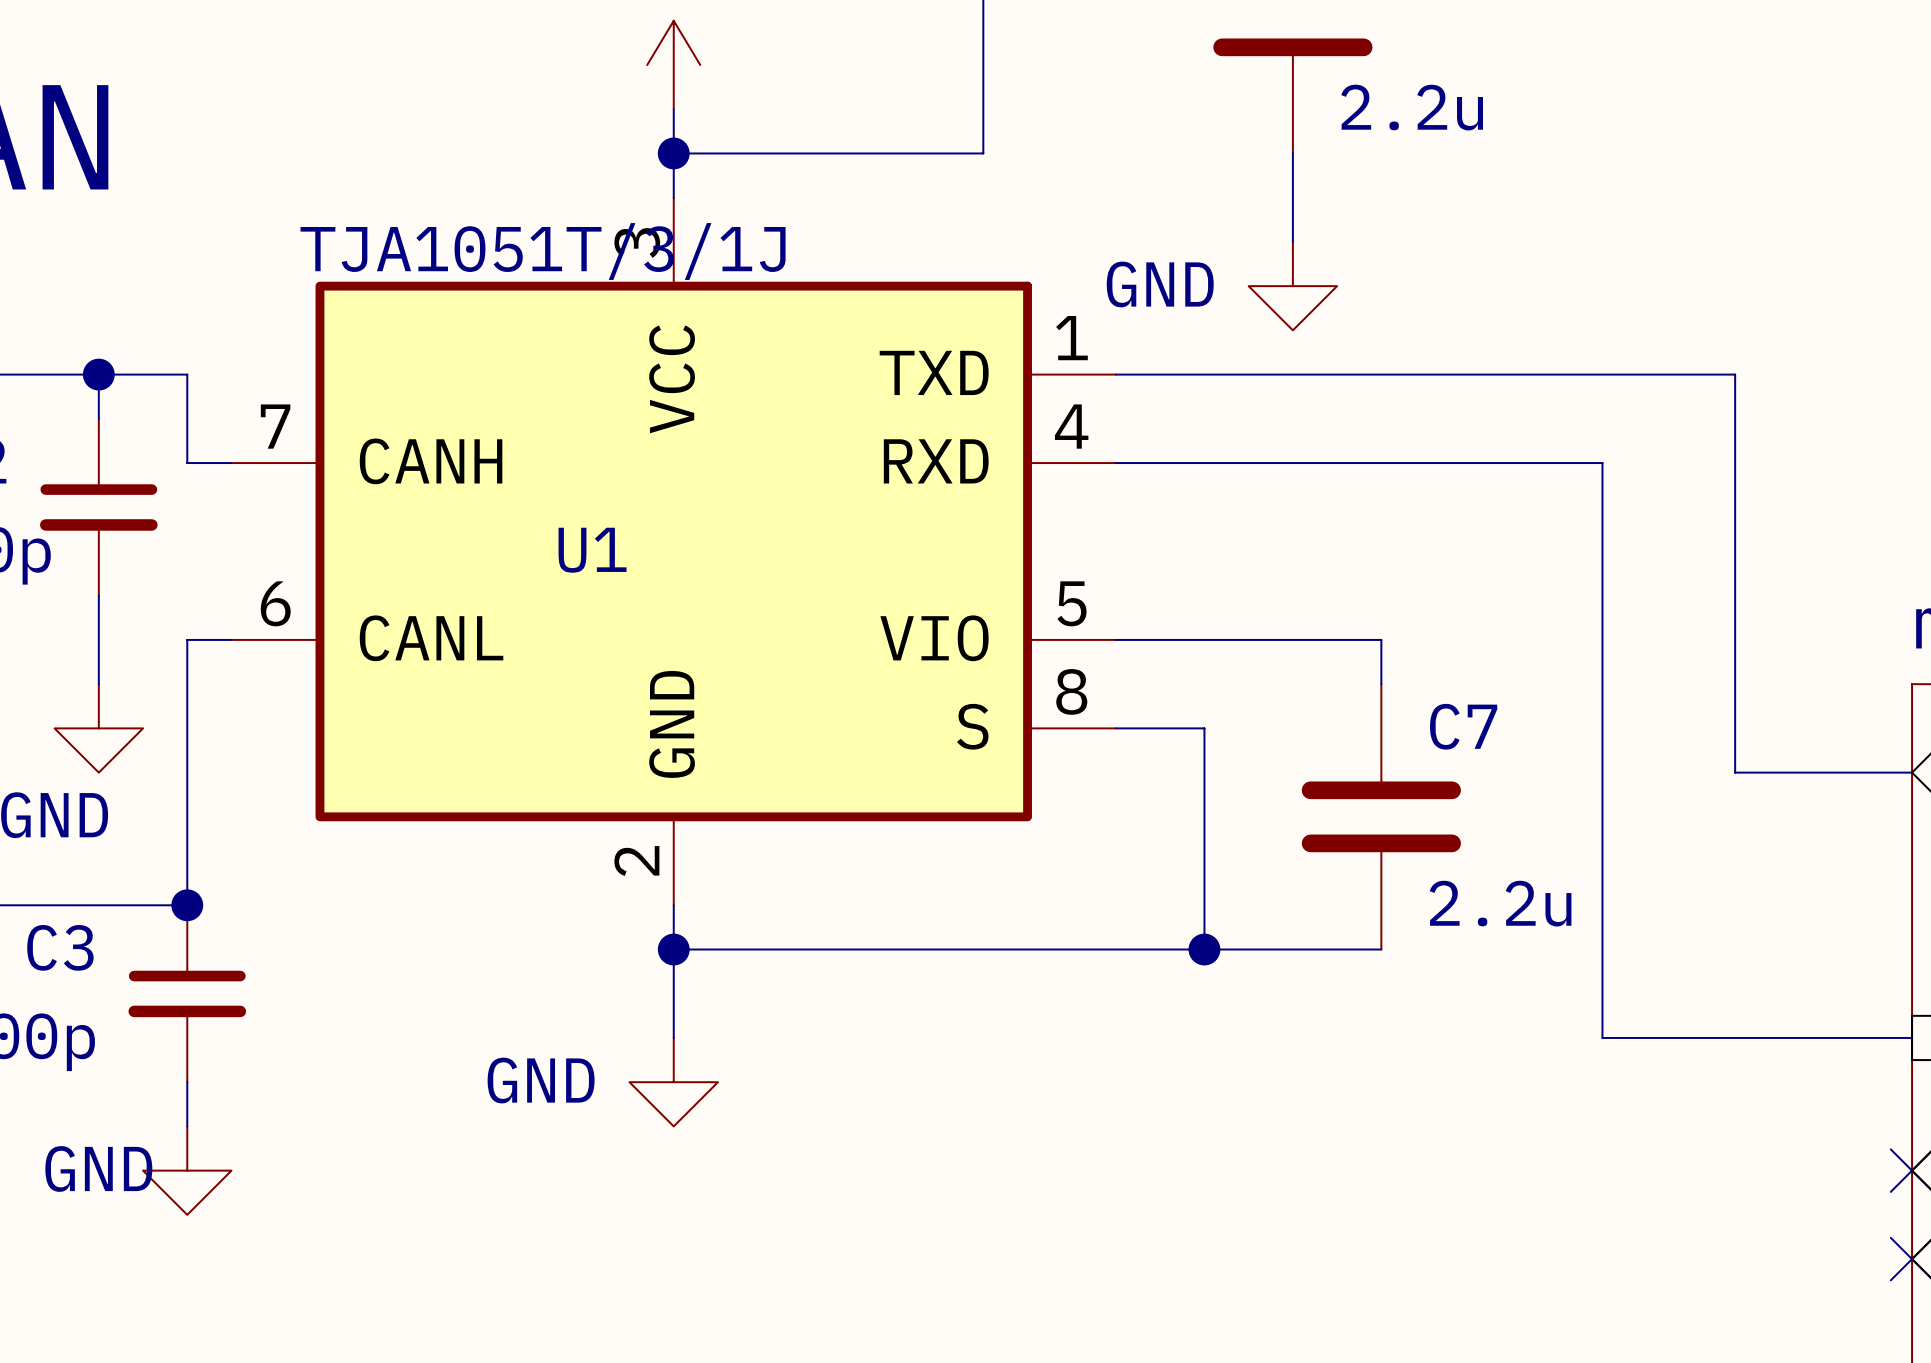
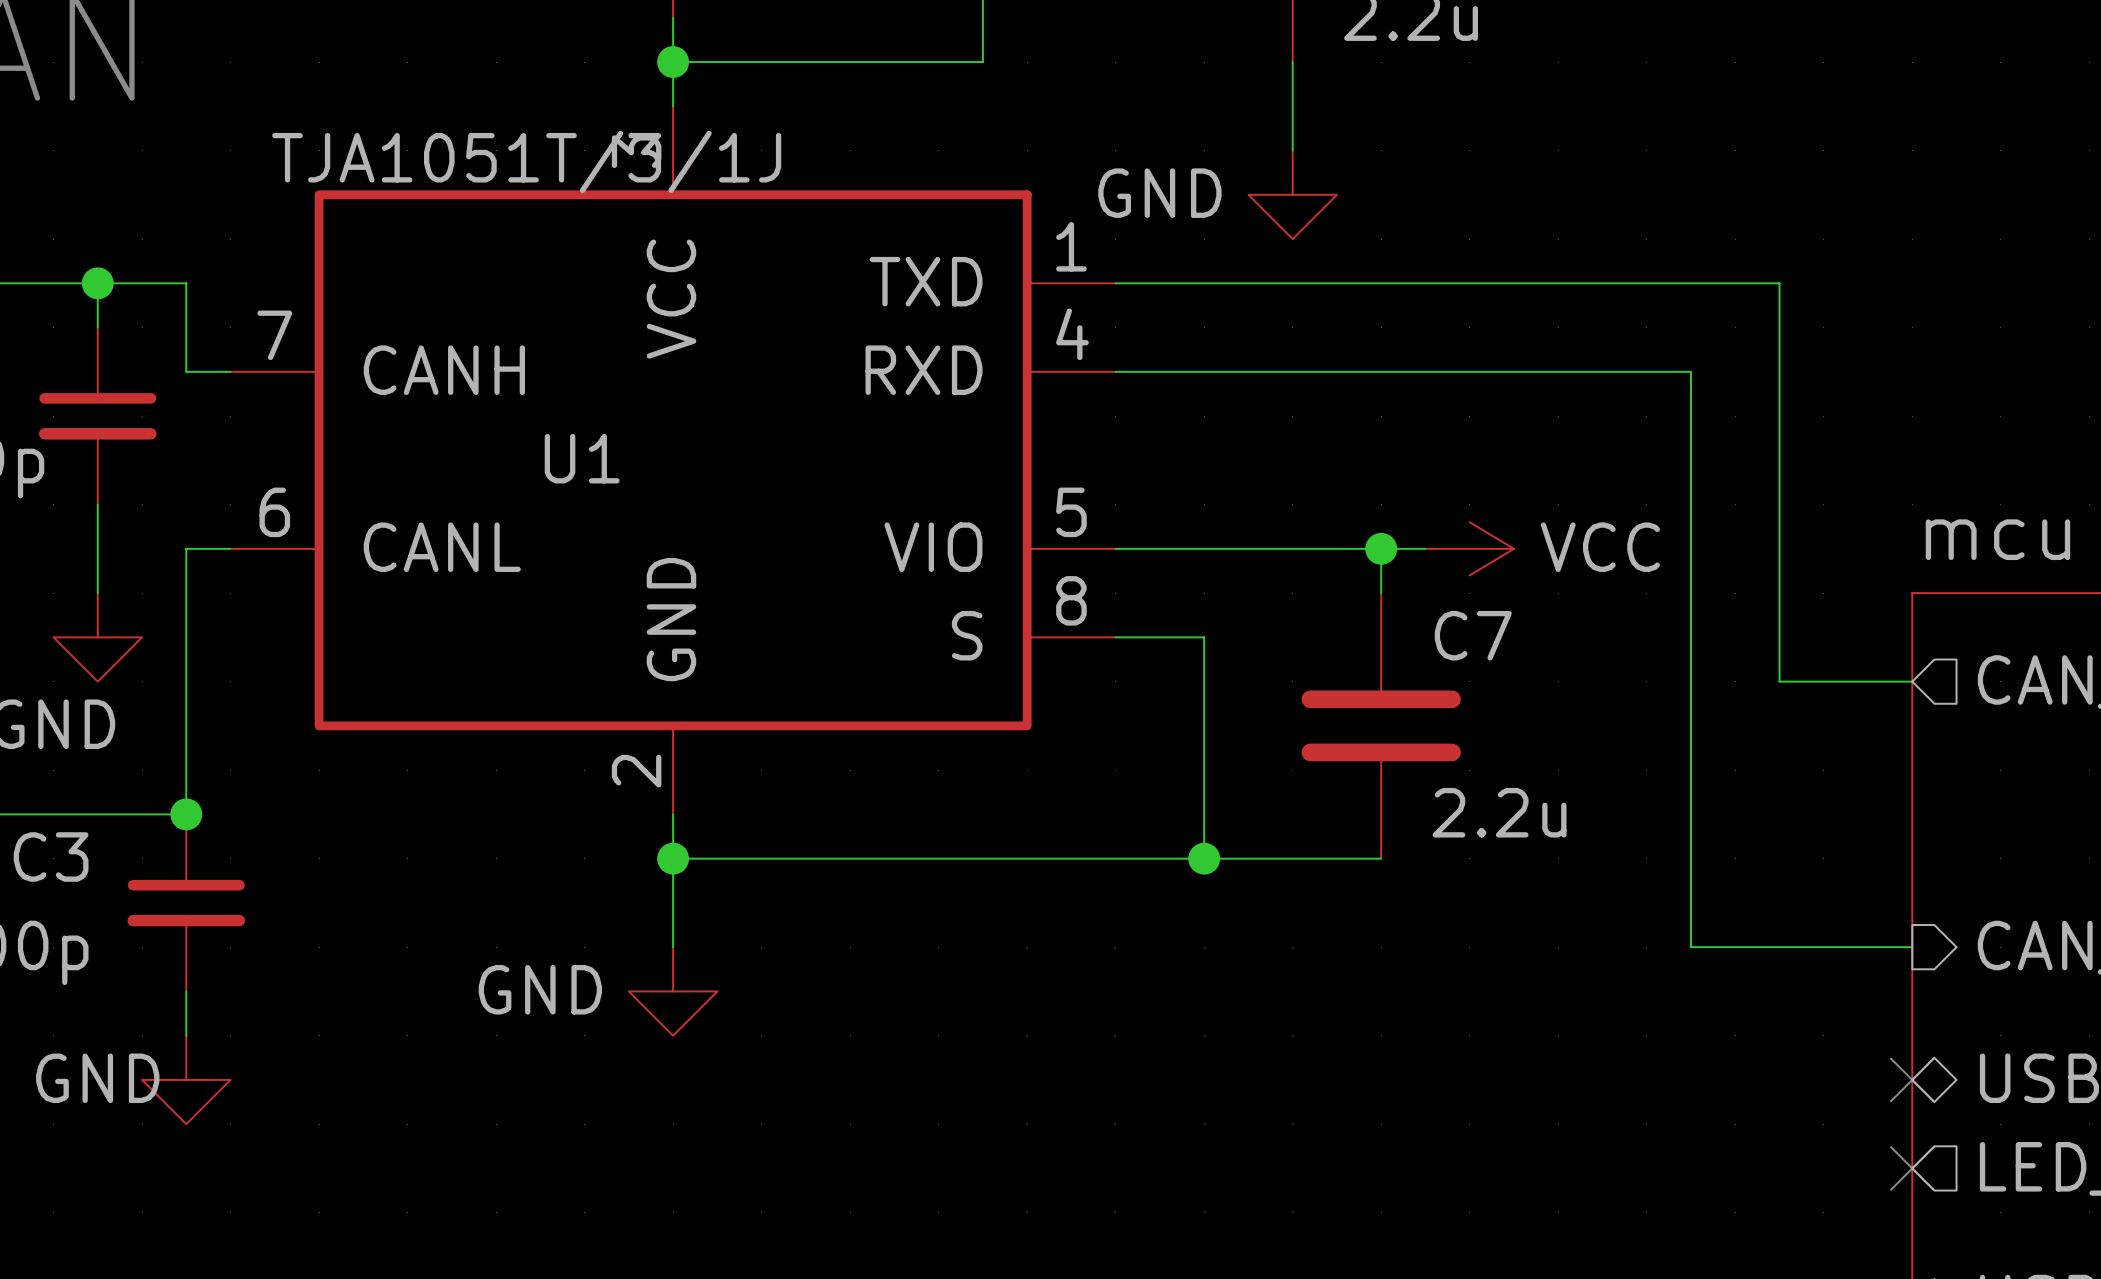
wire: (1735, 374) (1735, 772) (1779, 772) -> (1735, 283) (1779, 283) (1779, 681)
wire: (1602, 463) (1602, 1037) (1690, 1037) -> (1602, 371) (1691, 371) (1691, 947)
wire: none -> (1381, 548) (1425, 548)
junction: none -> (1381, 548)
power symbol: none -> VCC (1469, 548)

